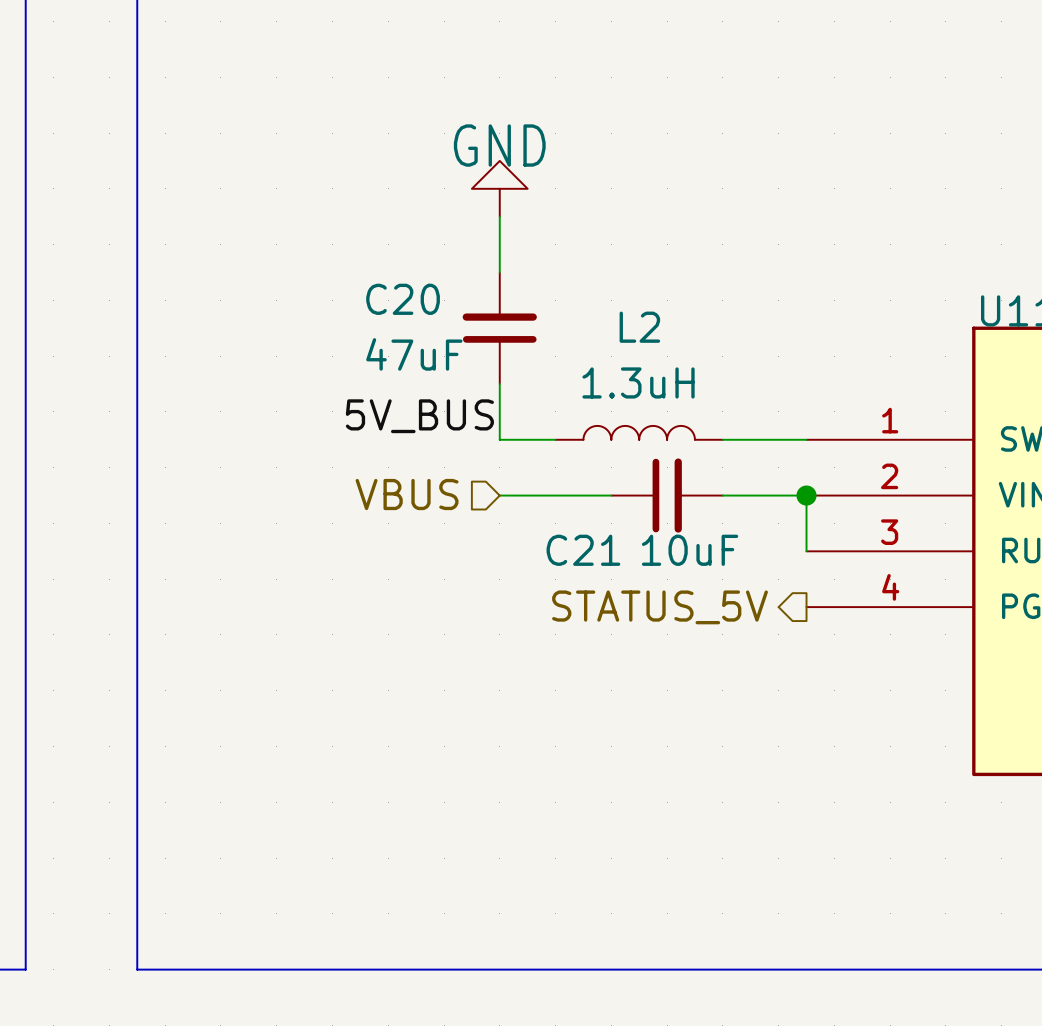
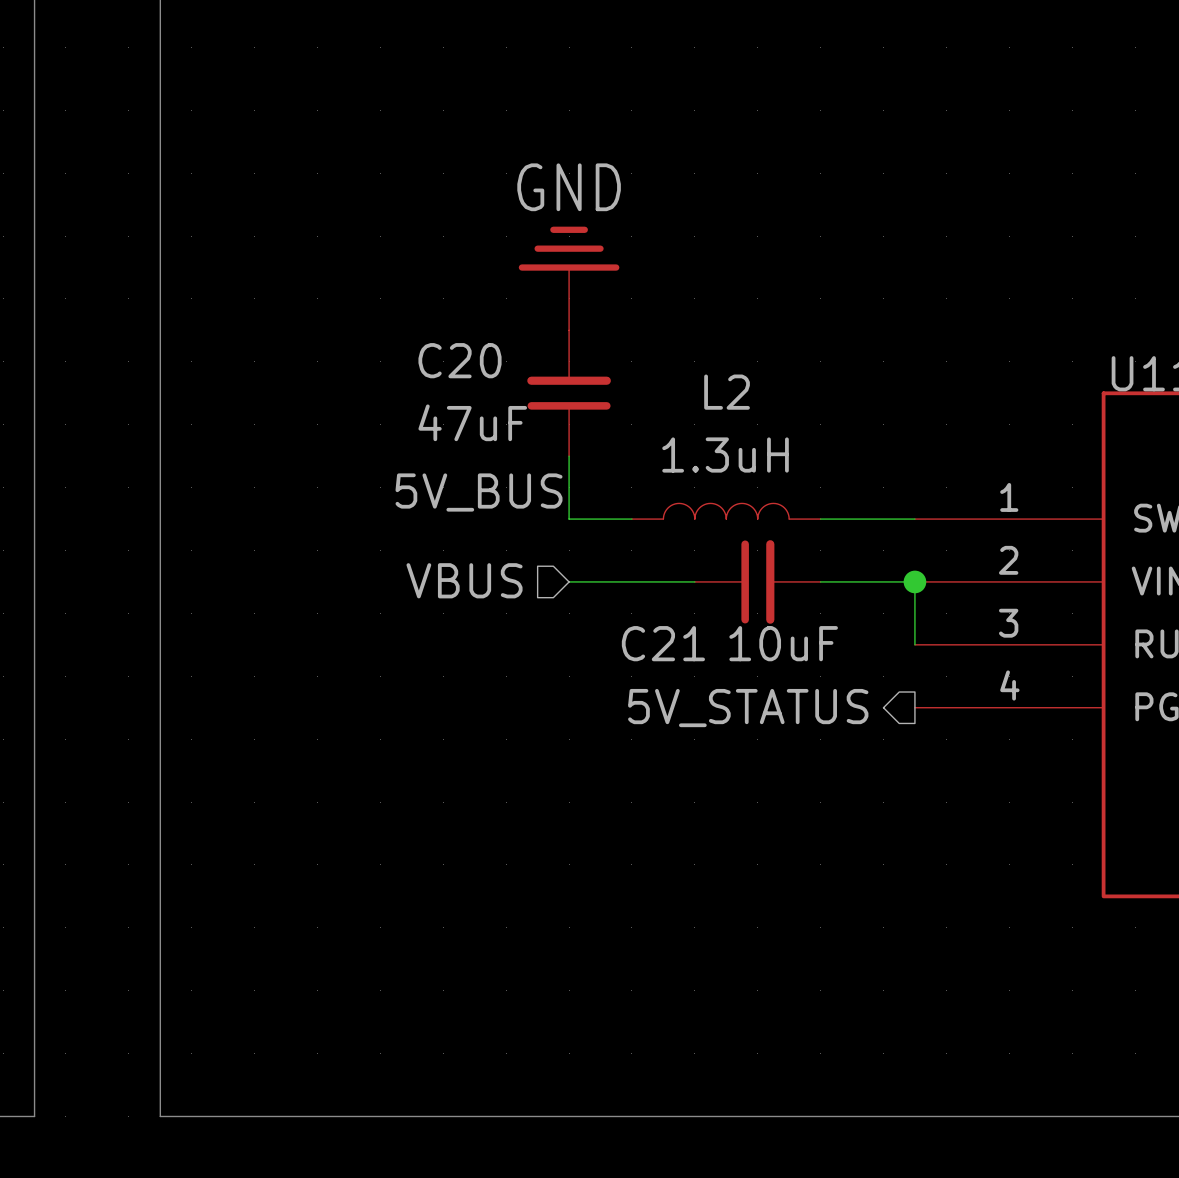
power symbol: GND (499, 188) -> none
power symbol: none -> GND (569, 278)
hierarchical label: STATUS_5V (660, 607) -> 5V_STATUS (748, 708)

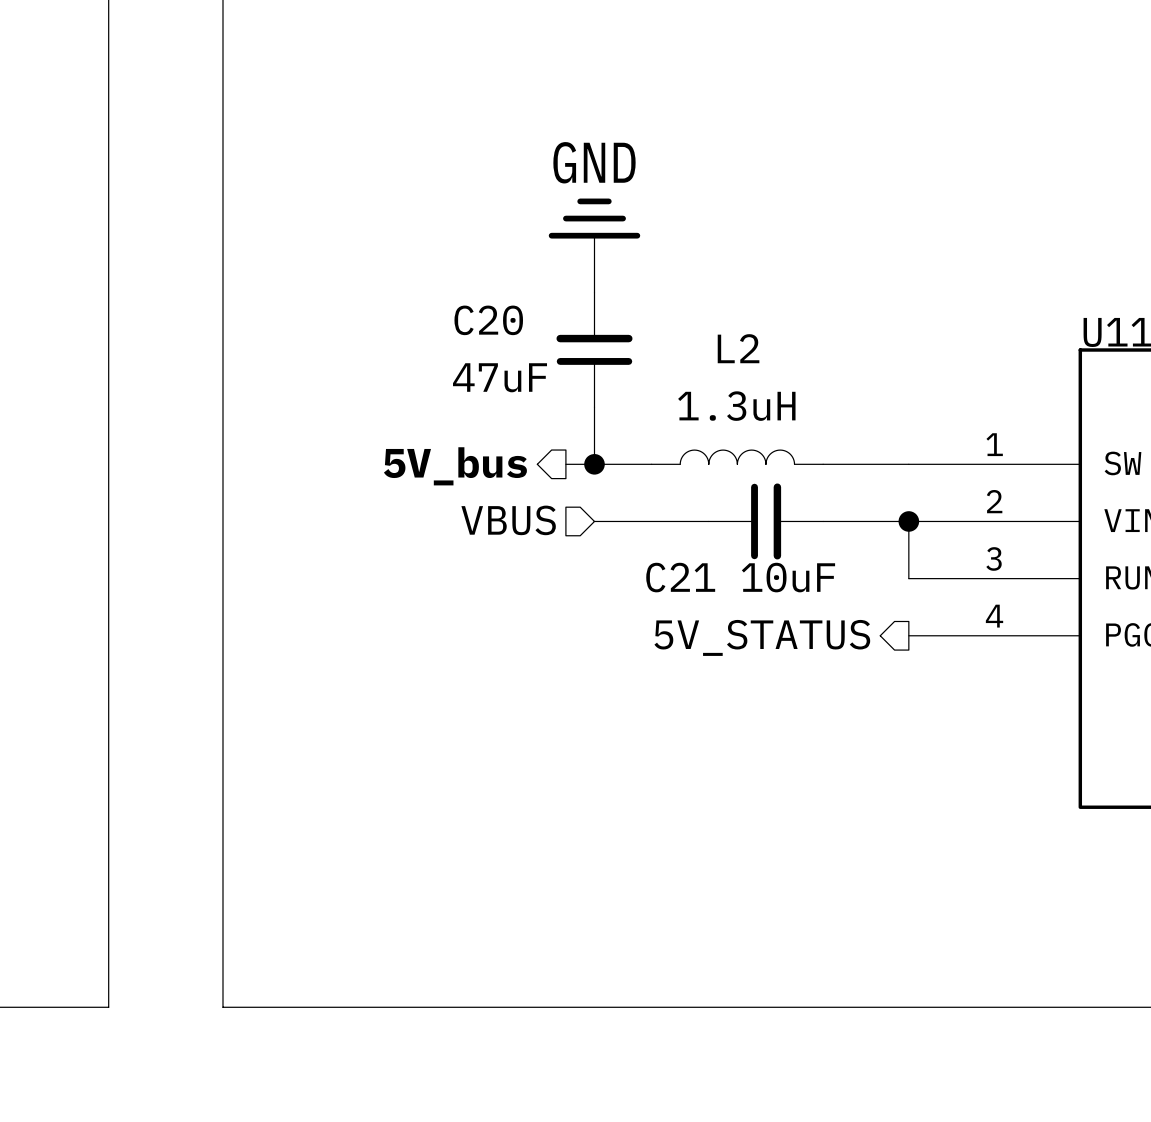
label: 5V_BUS (479, 492) -> none
hierarchical label: none -> 5V_bus (455, 466)
wire: none -> (565, 464) (594, 464)
junction: none -> (594, 464)

